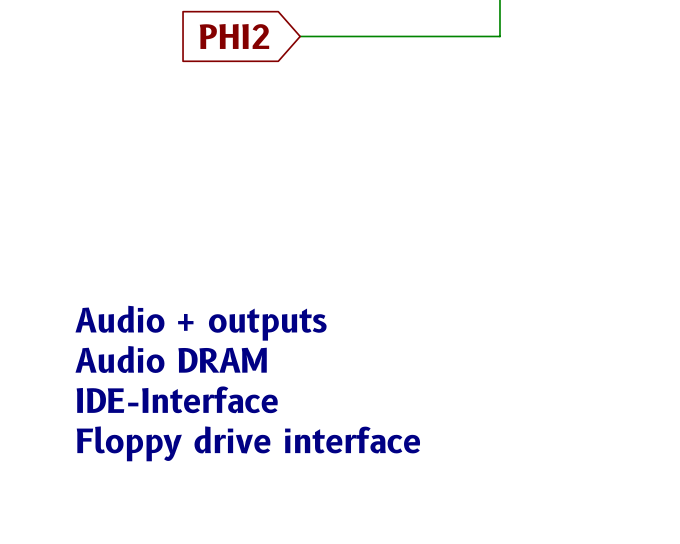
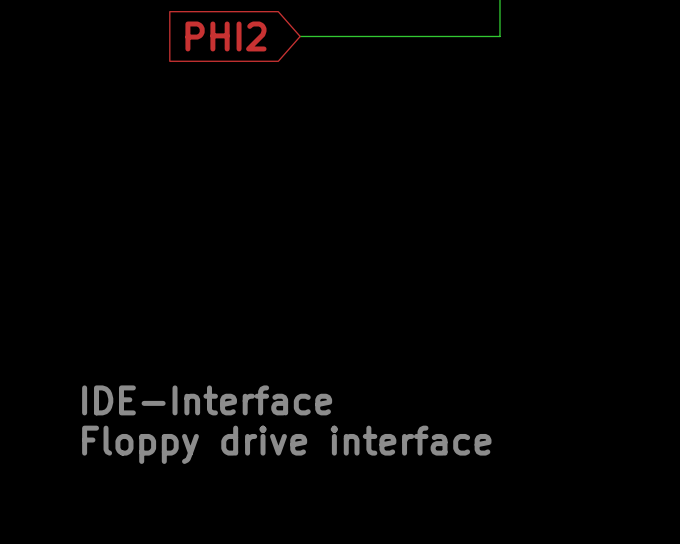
text: Audio + outputs (201, 323) -> none
text: Audio DRAM (171, 359) -> none

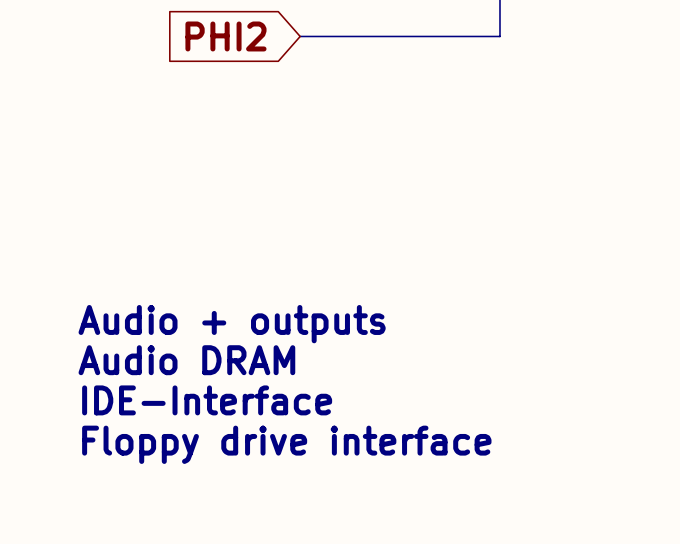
text: none -> Audio + outputs (232, 324)
text: none -> Audio DRAM (186, 360)

